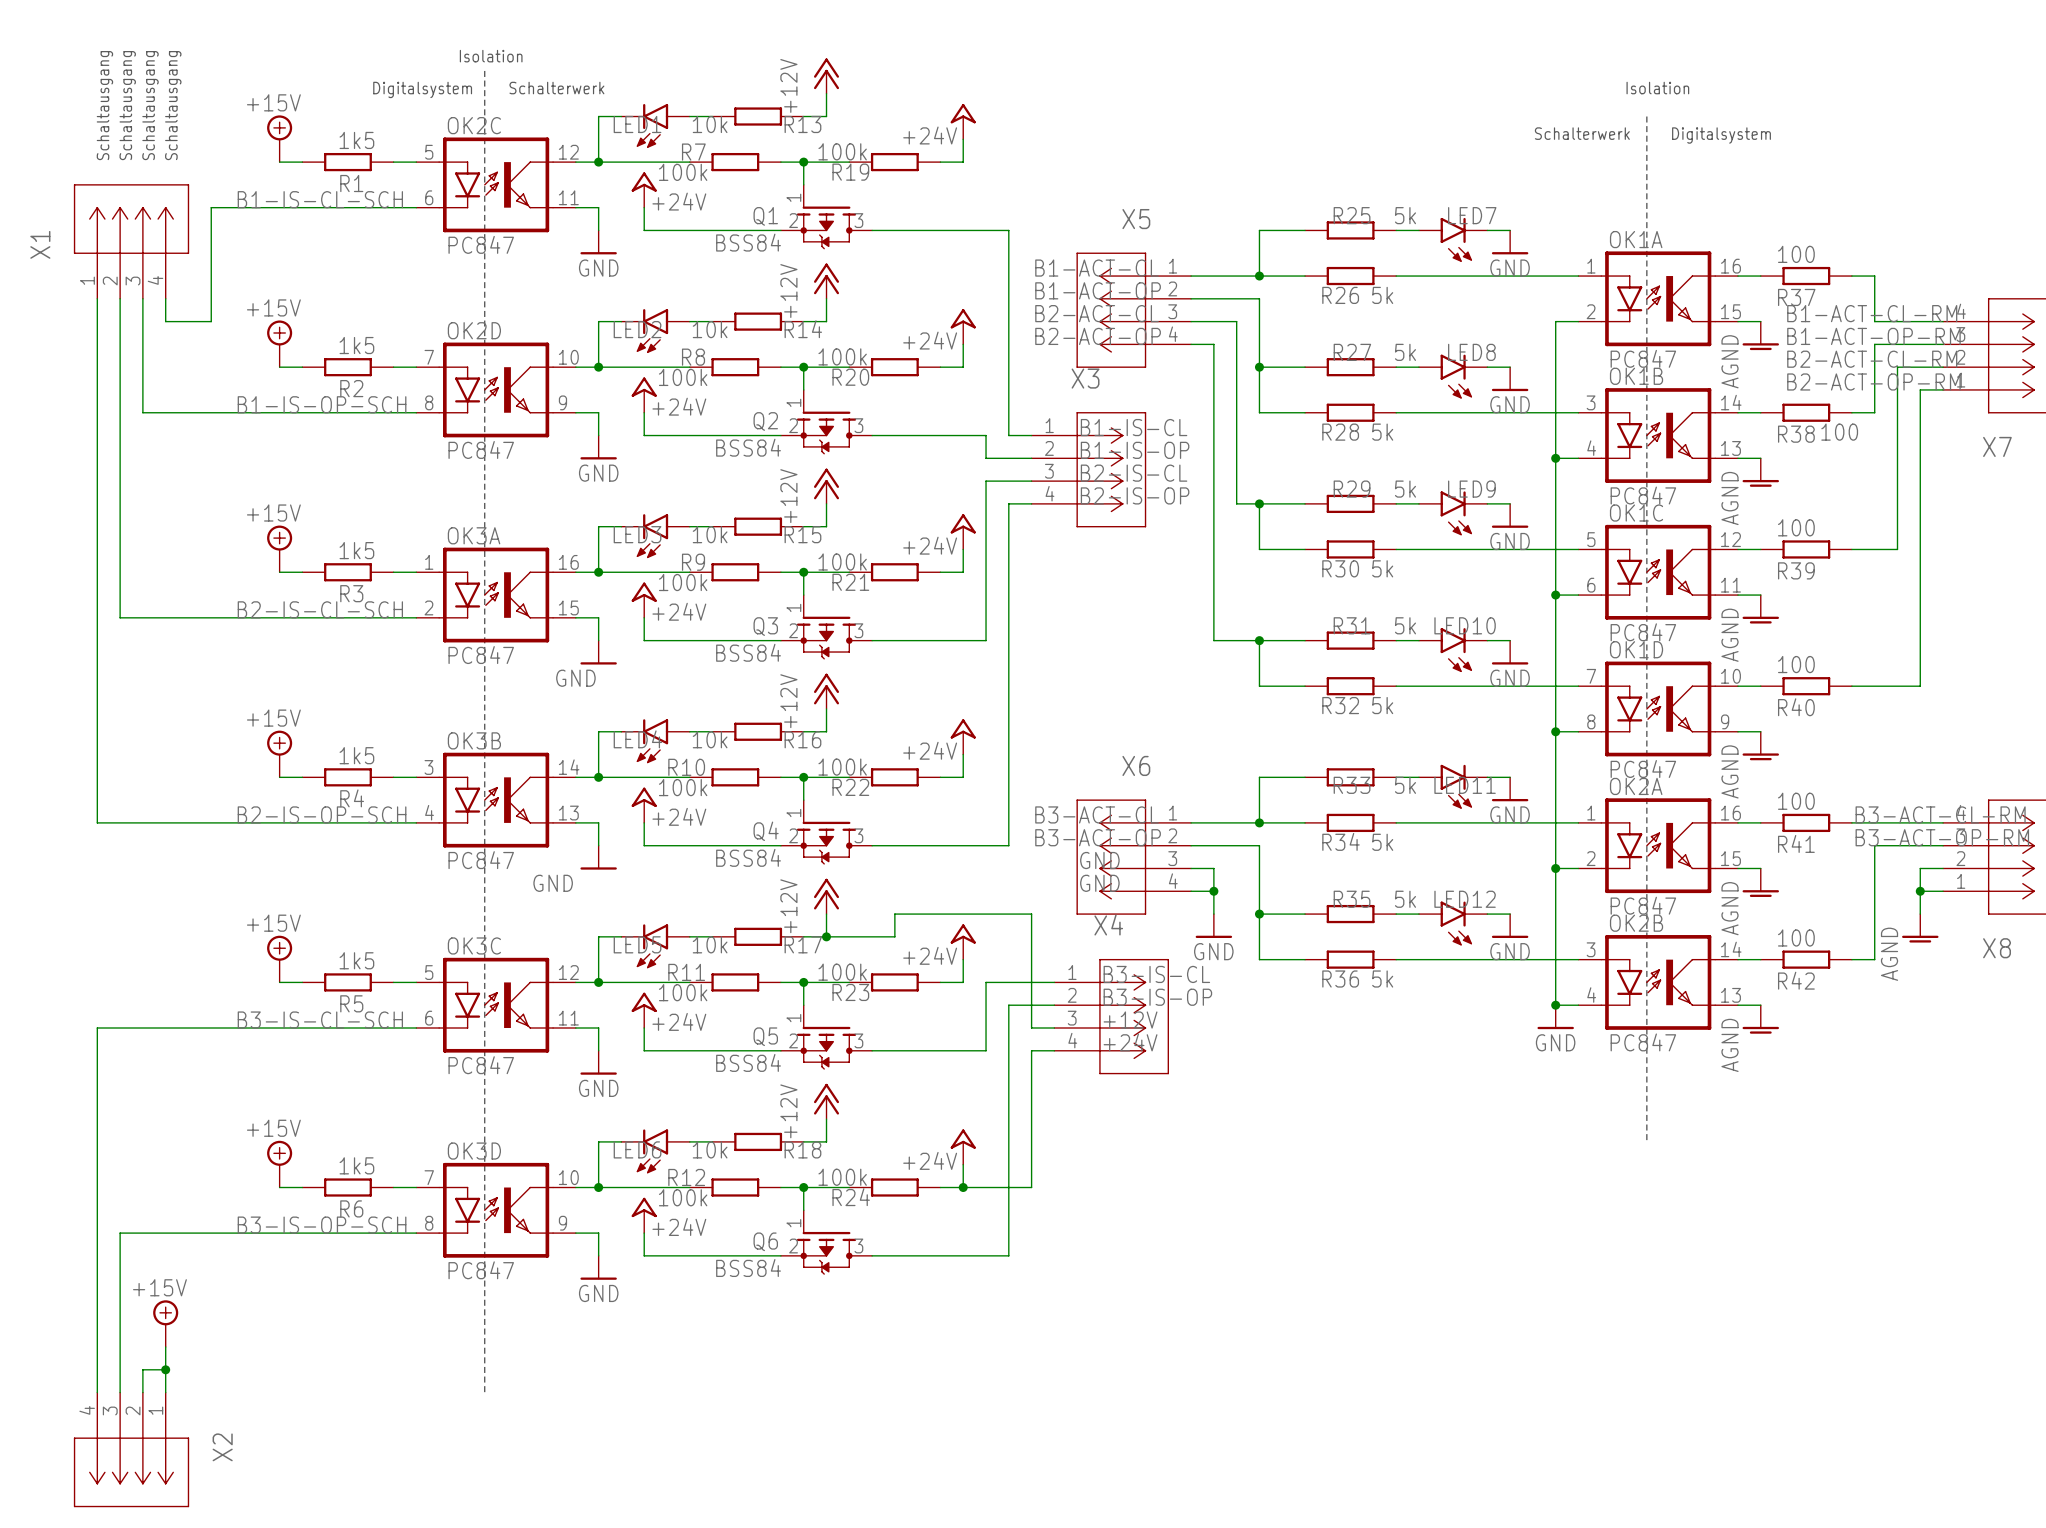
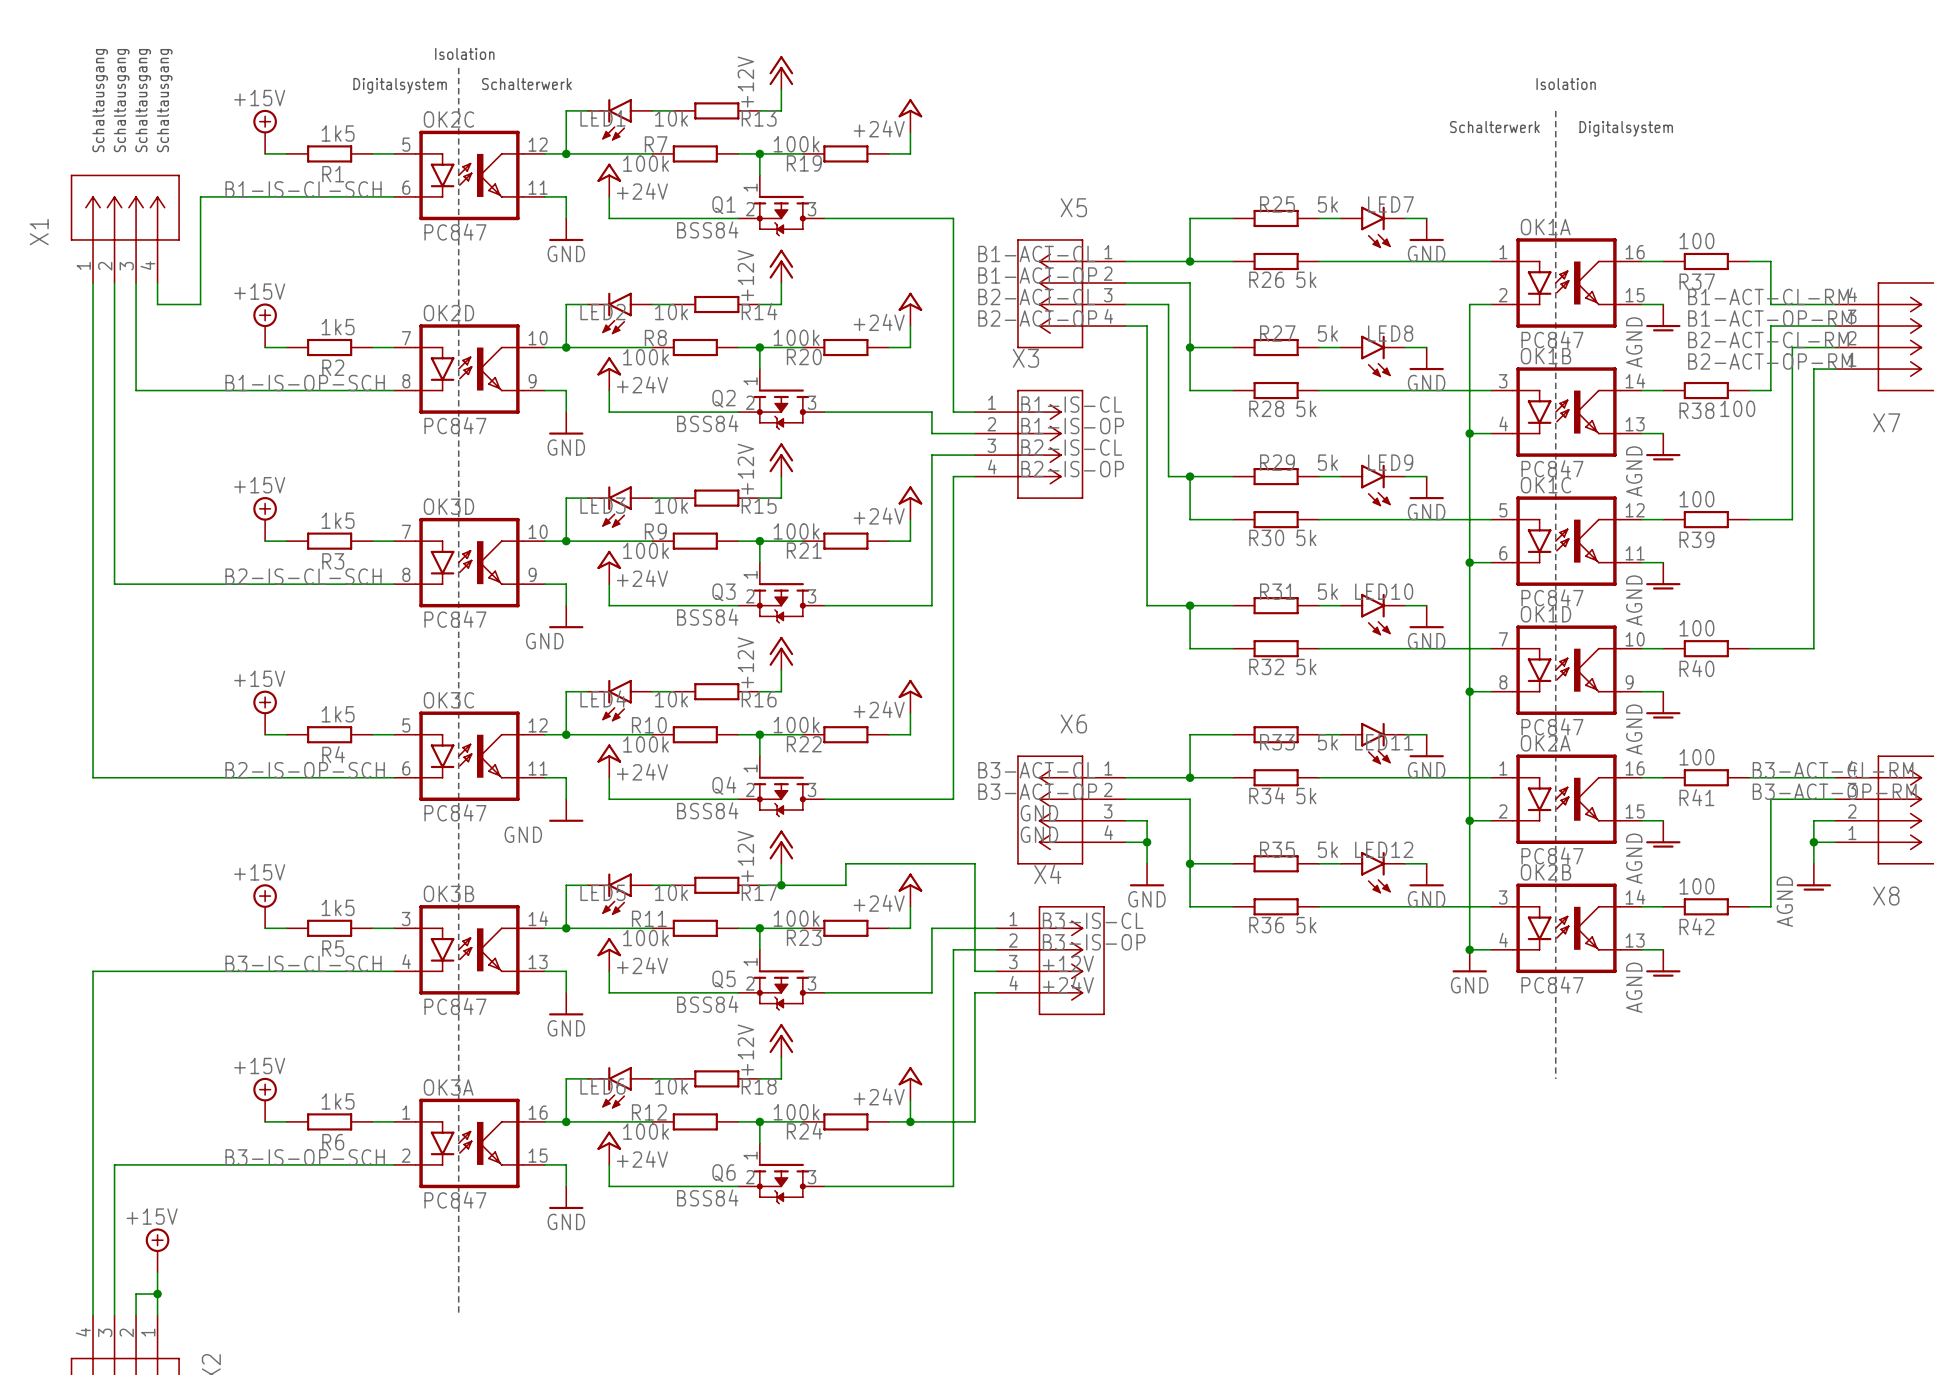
OK3A position: (496, 595) -> (469, 1143)
OK3B position: (496, 800) -> (469, 949)
OK3C position: (496, 1005) -> (469, 756)
OK3D position: (496, 1210) -> (469, 562)

